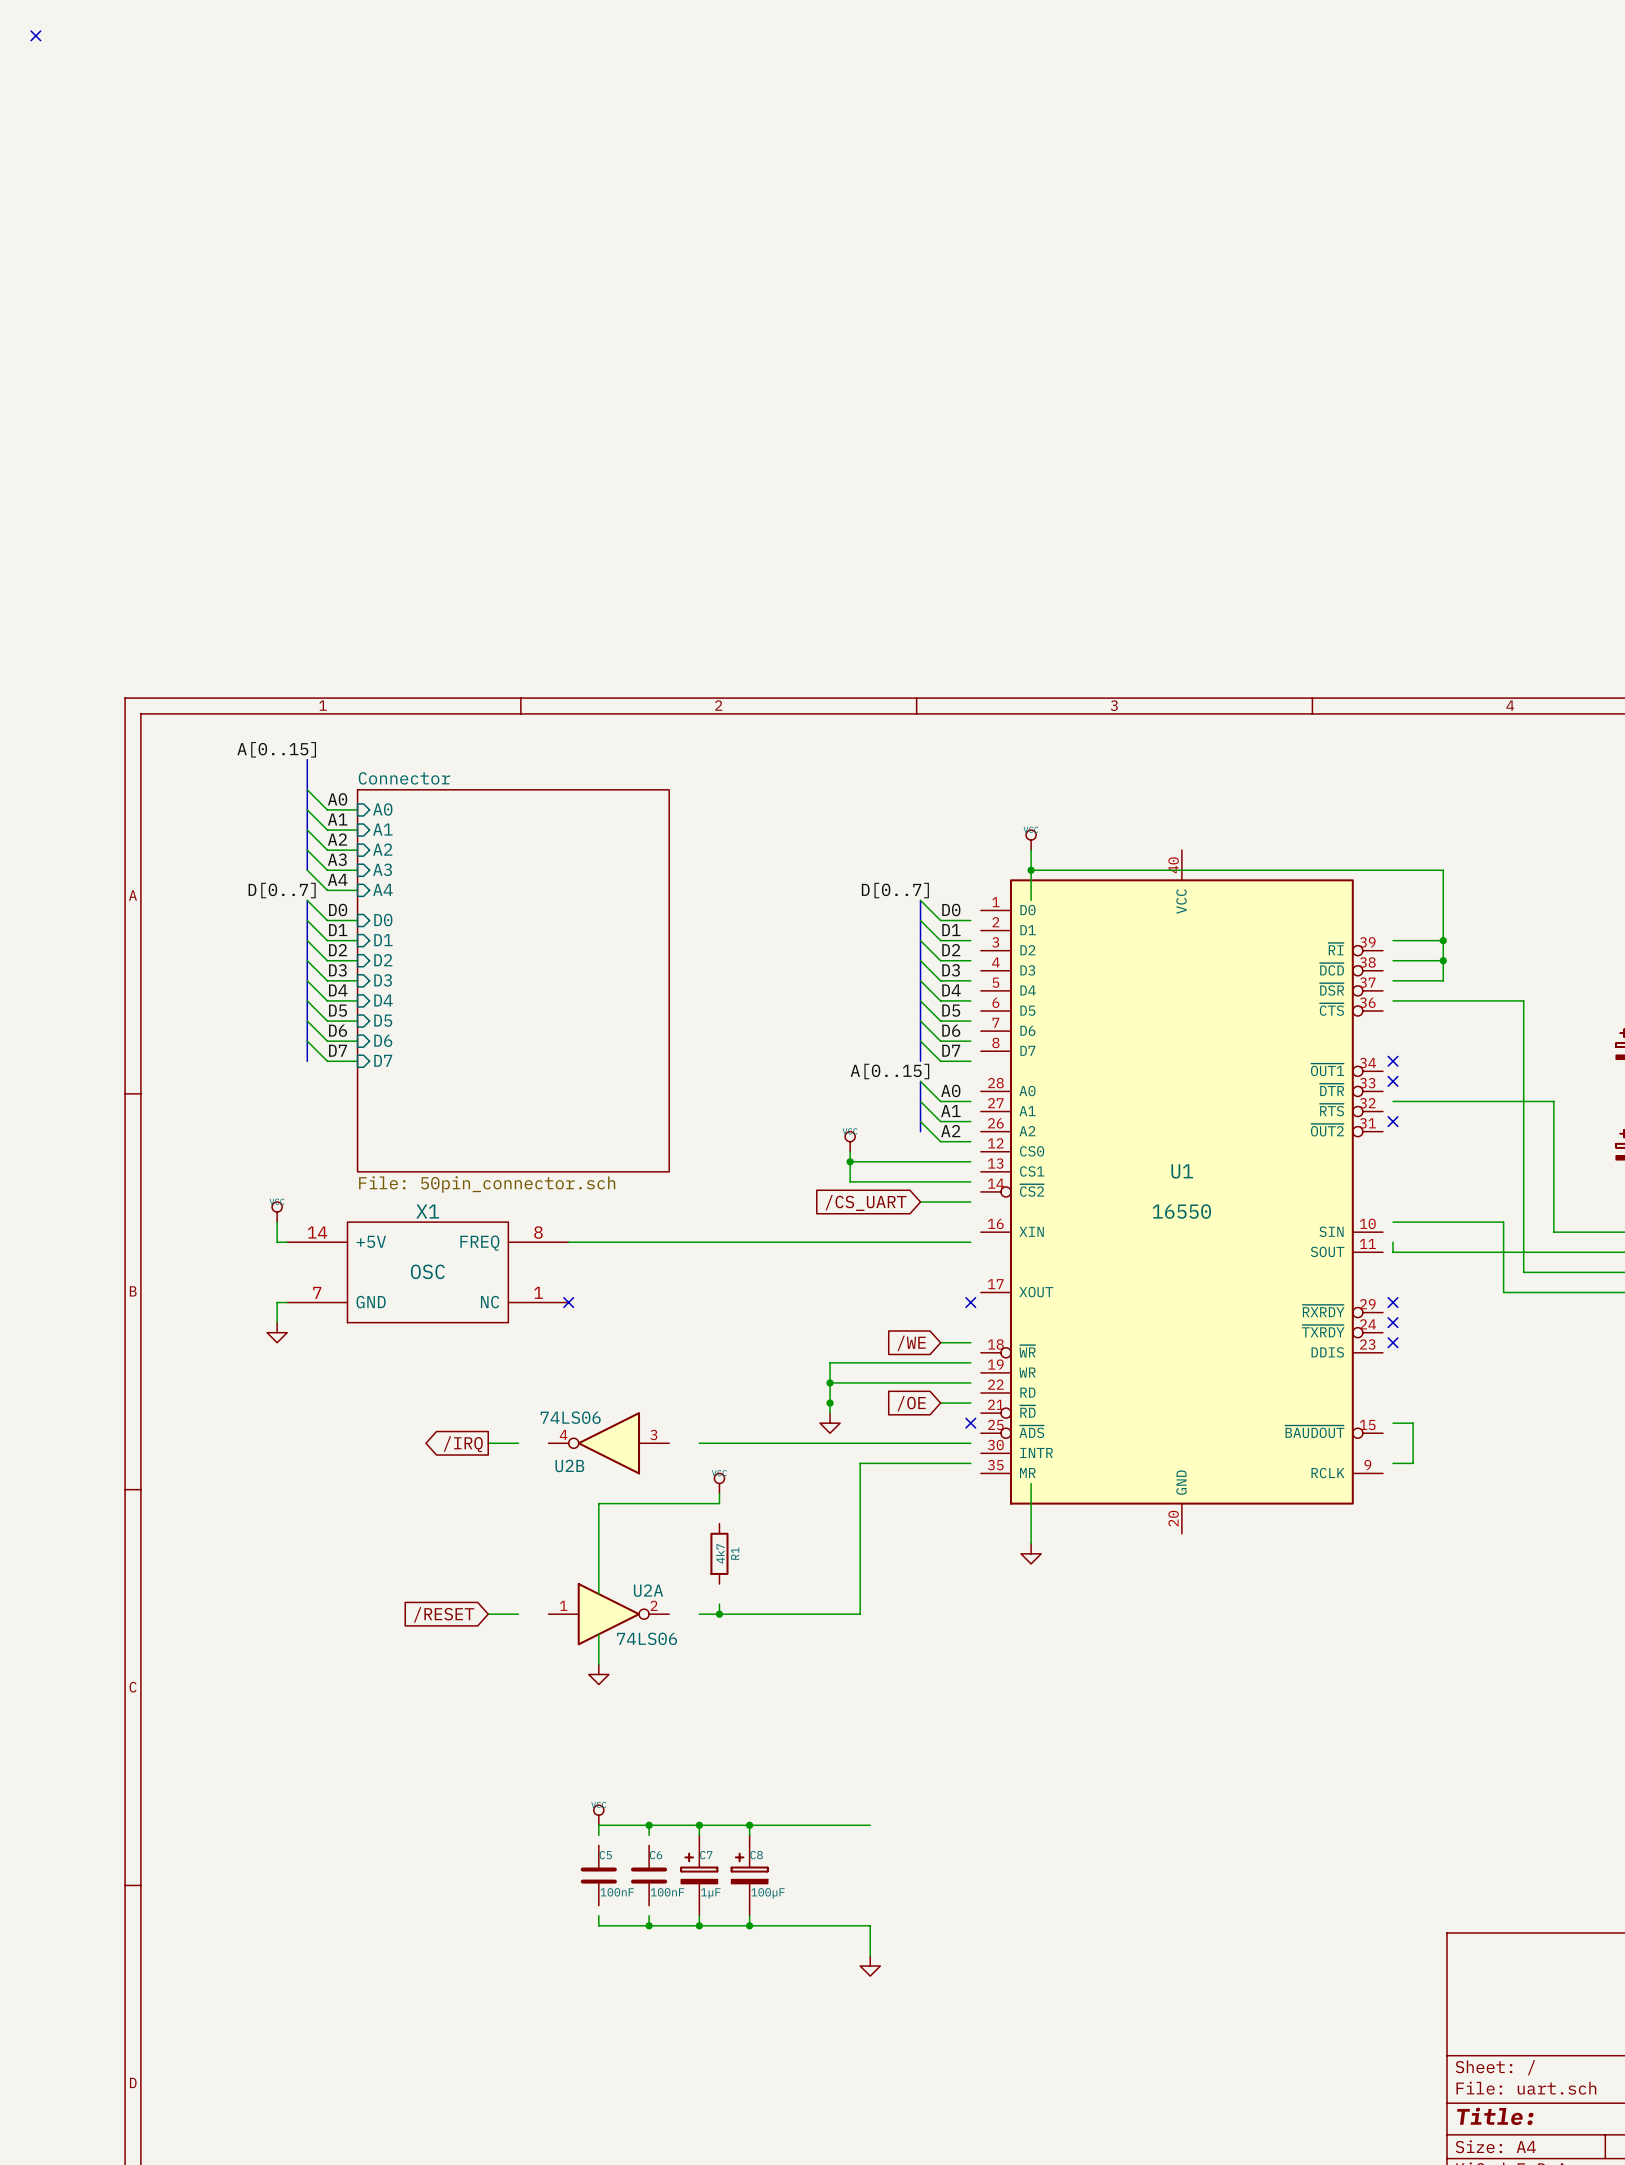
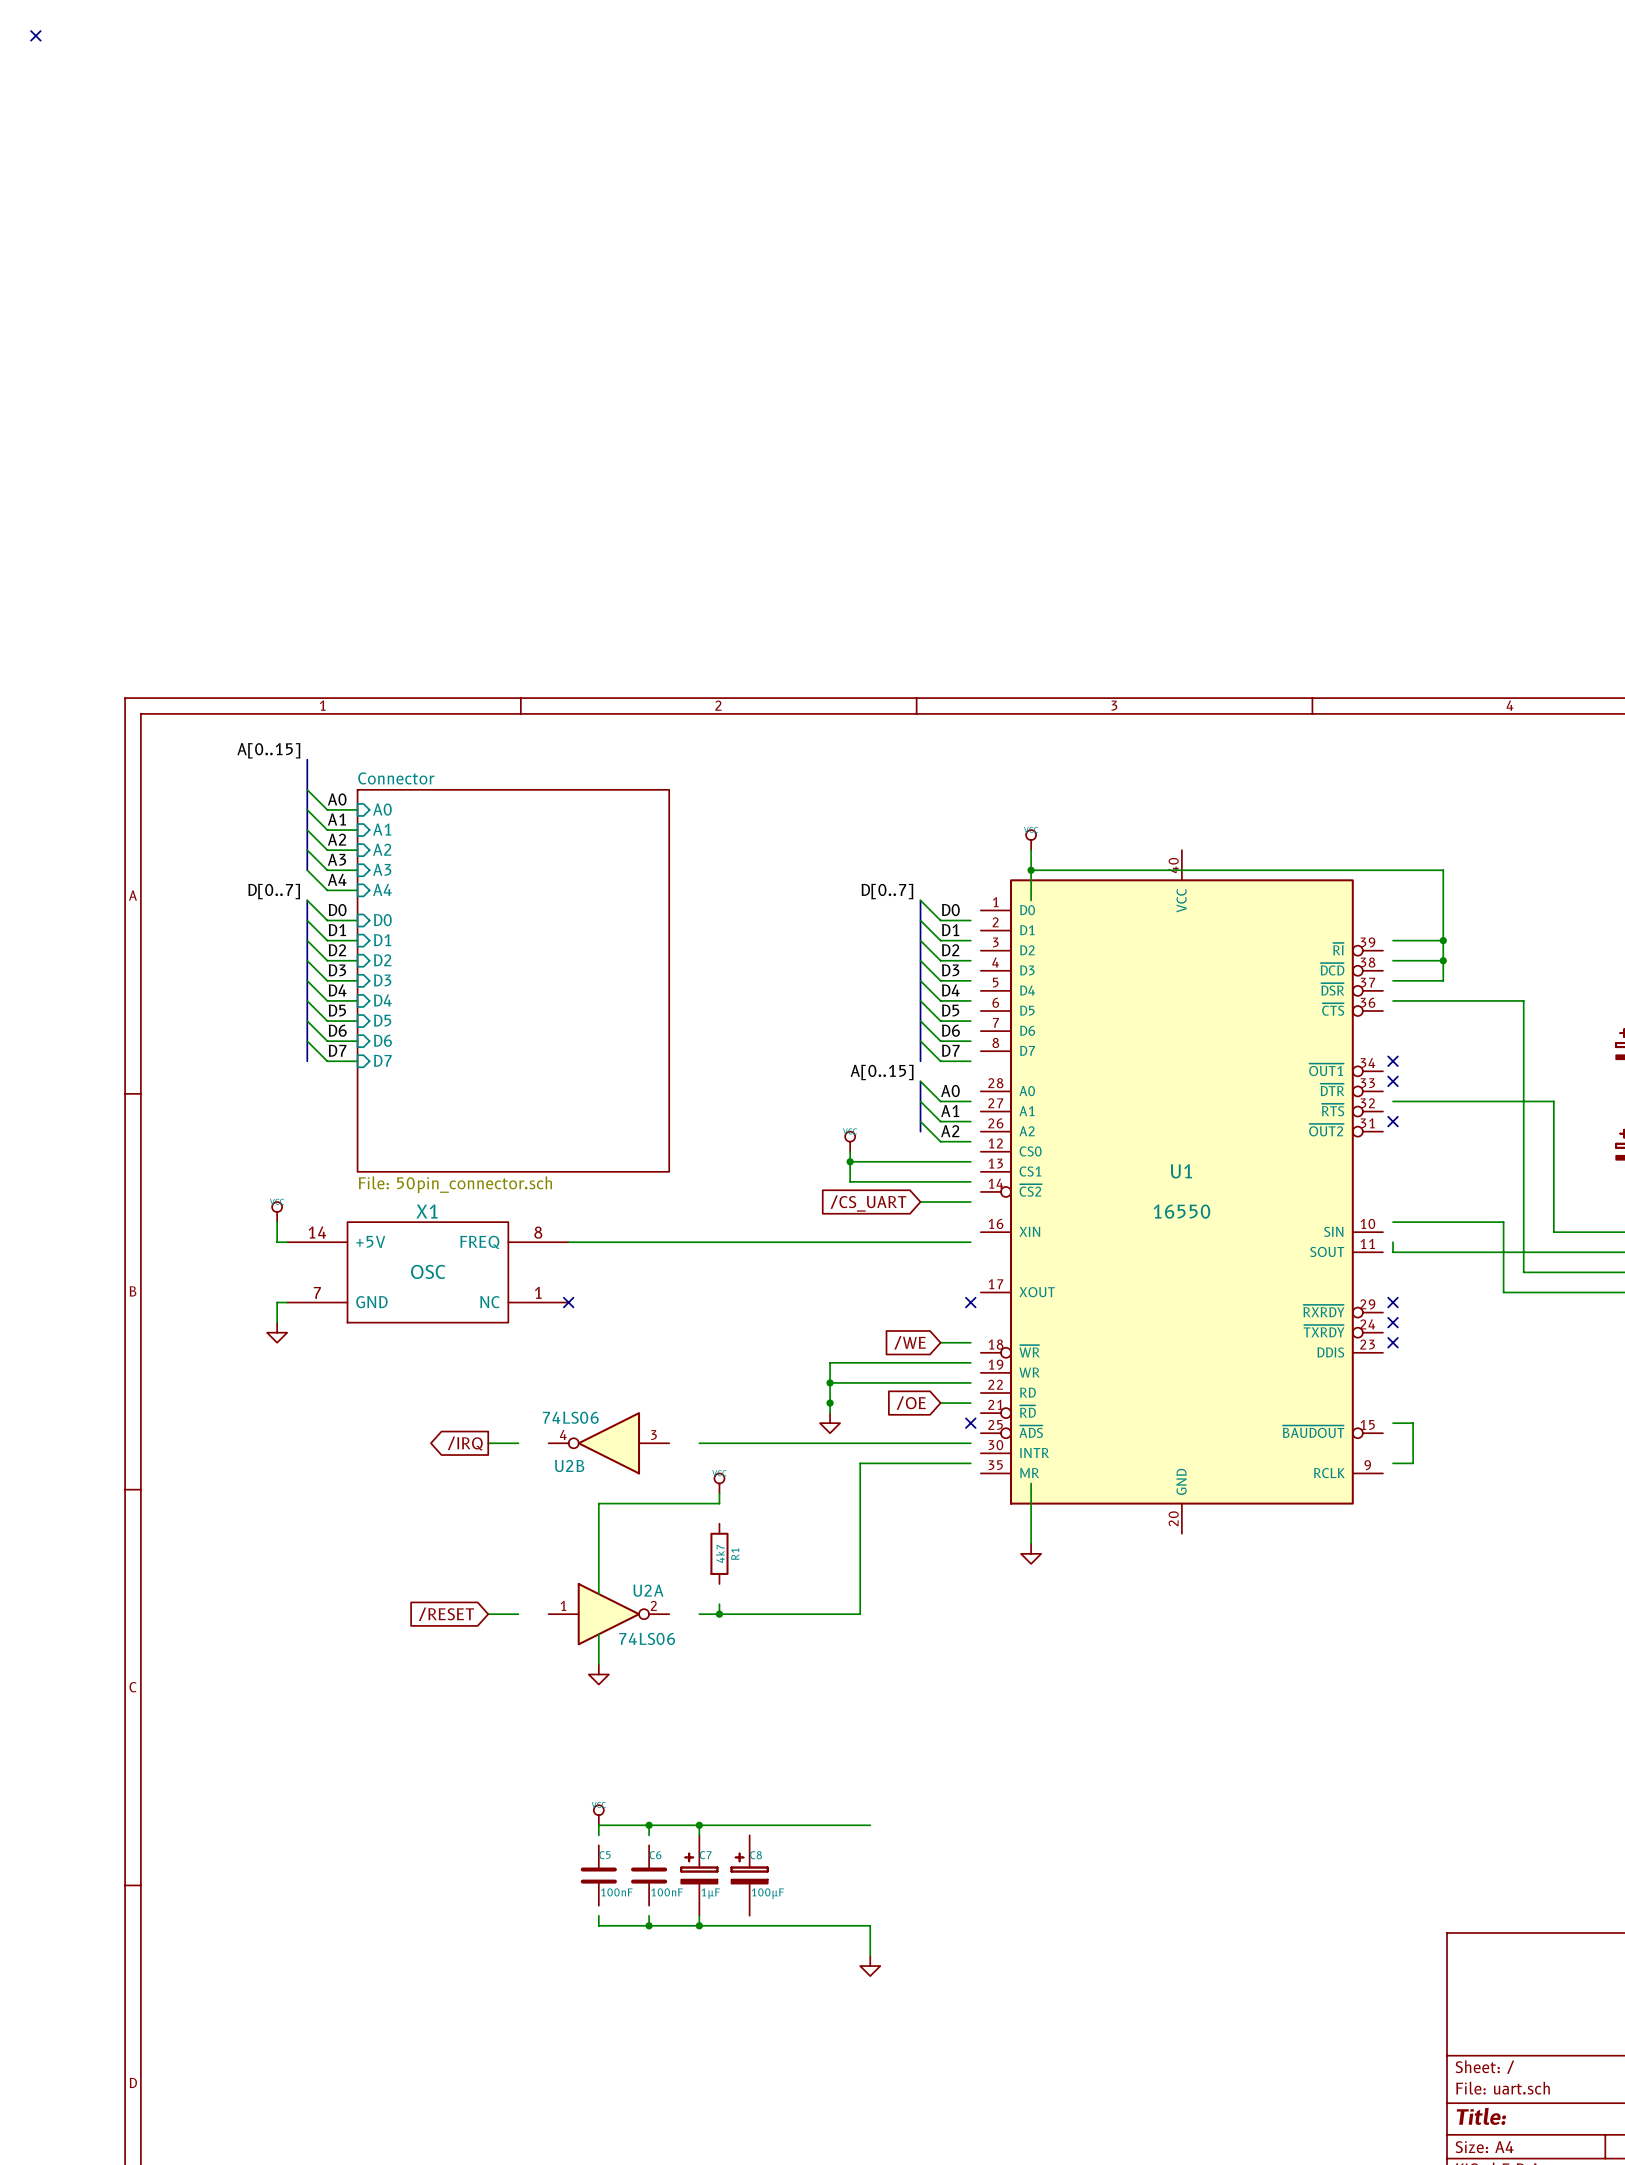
wire: (749, 1825) (749, 1835) -> none
junction: (749, 1825) -> none
wire: (749, 1915) (749, 1925) -> none
junction: (749, 1925) -> none

